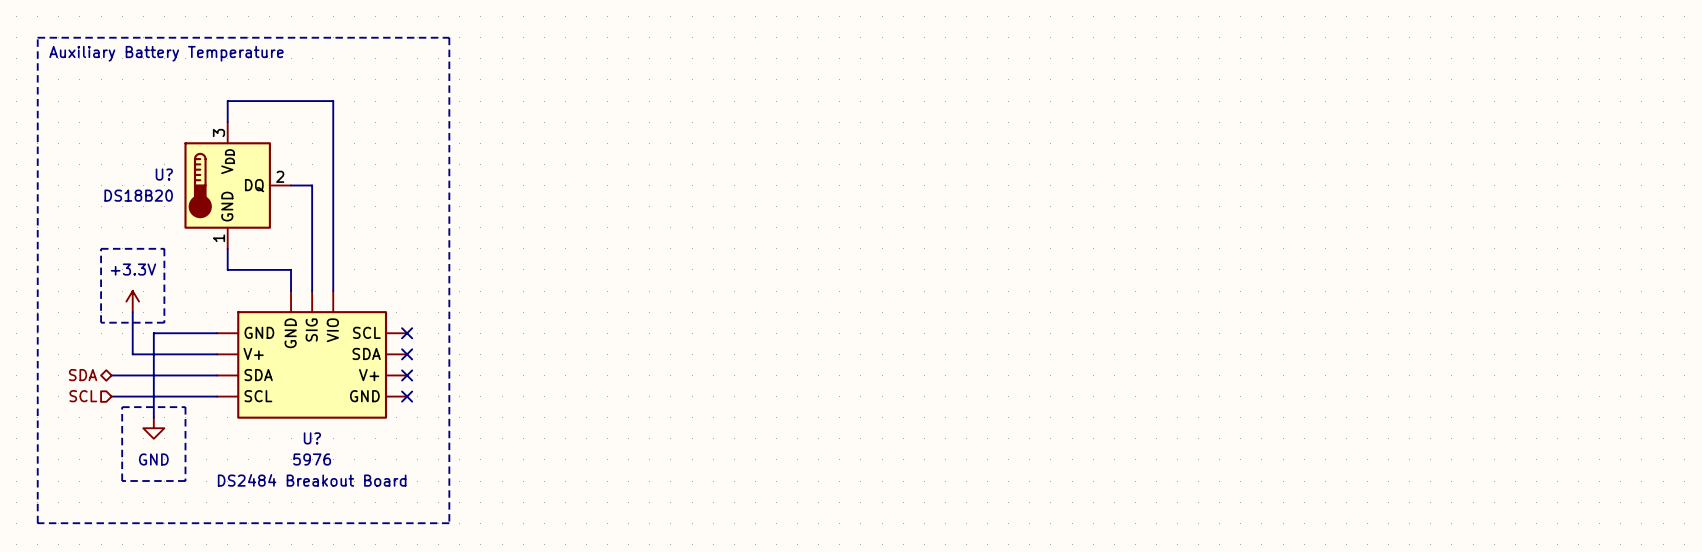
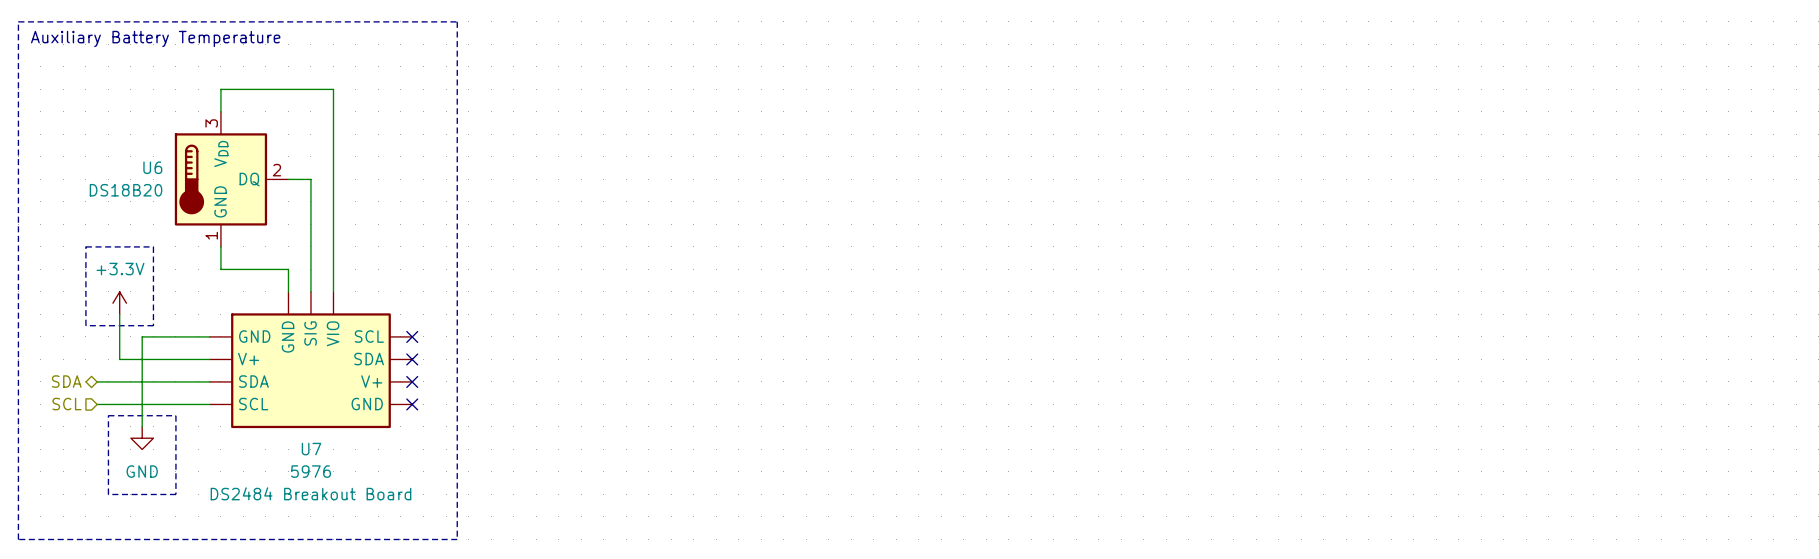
U? name: U? (164, 174) -> U6 (152, 167)
U? name: U? (312, 438) -> U7 (311, 449)

